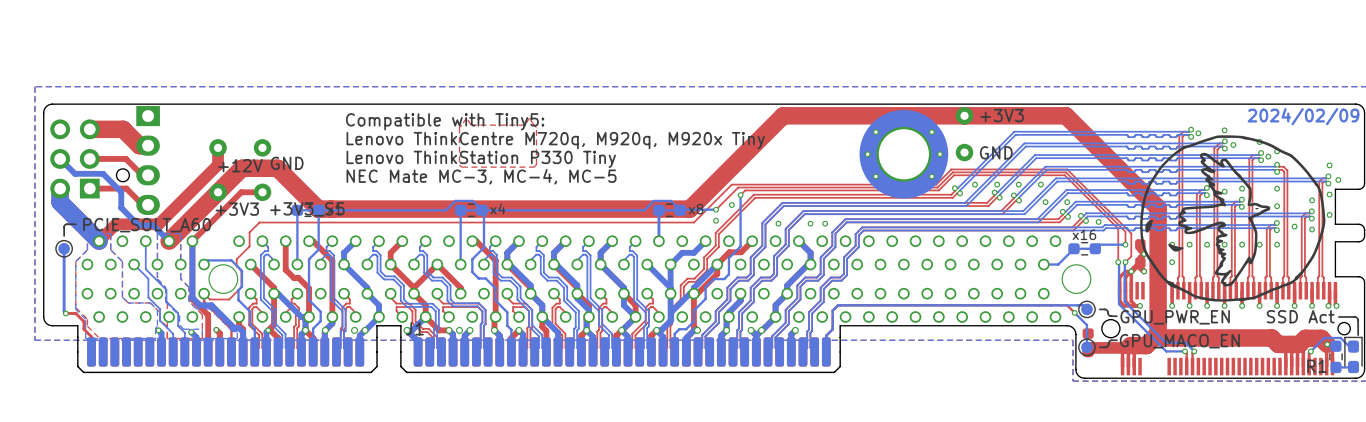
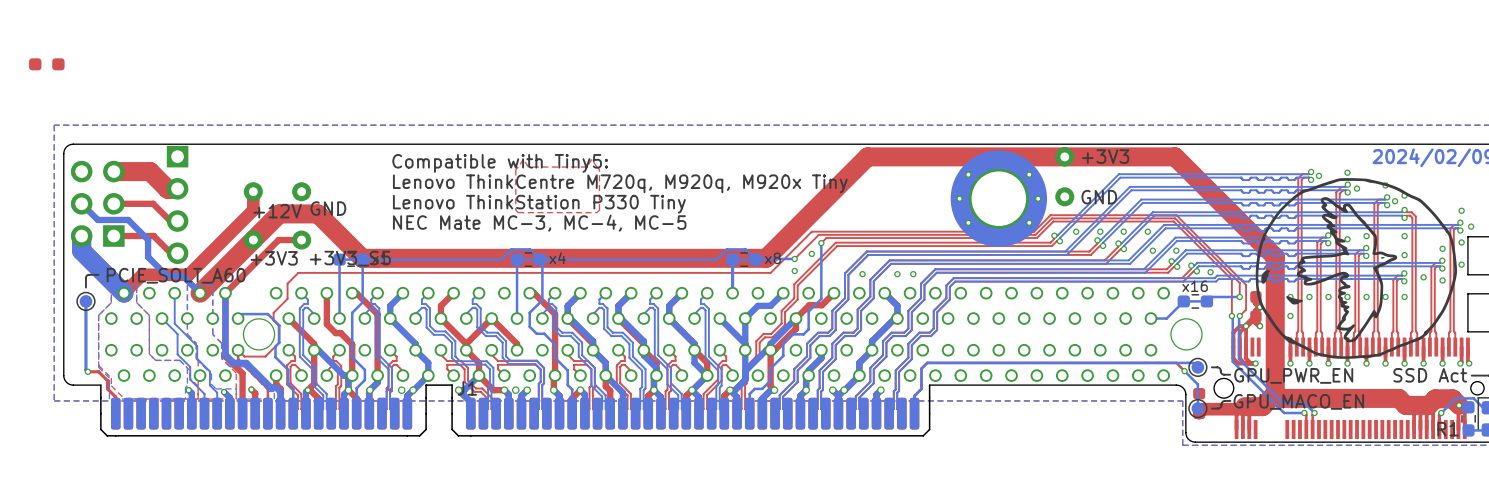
part: none -> (46, 64)
part footprint: [116, 105, 160, 216] -> [166, 145, 189, 265]

